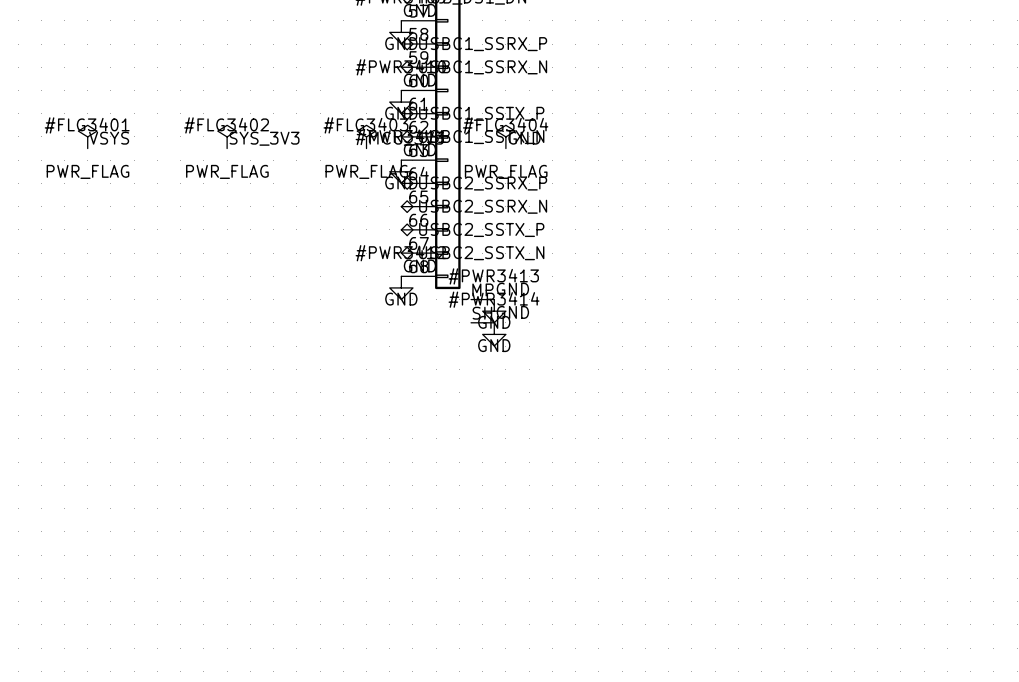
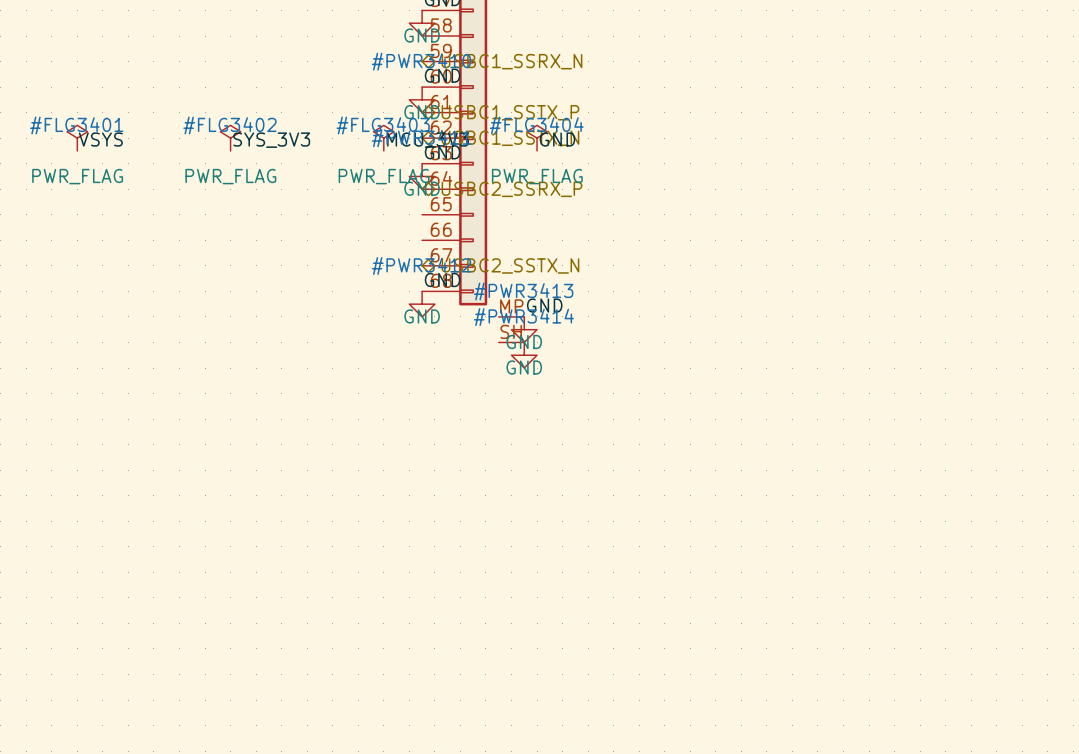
hierarchical label: USBC1_SSRX_P (483, 44) -> none
hierarchical label: USBC2_SSRX_N (483, 206) -> none
hierarchical label: USBC2_SSTX_P (481, 229) -> none
label: GND (512, 312) -> none

